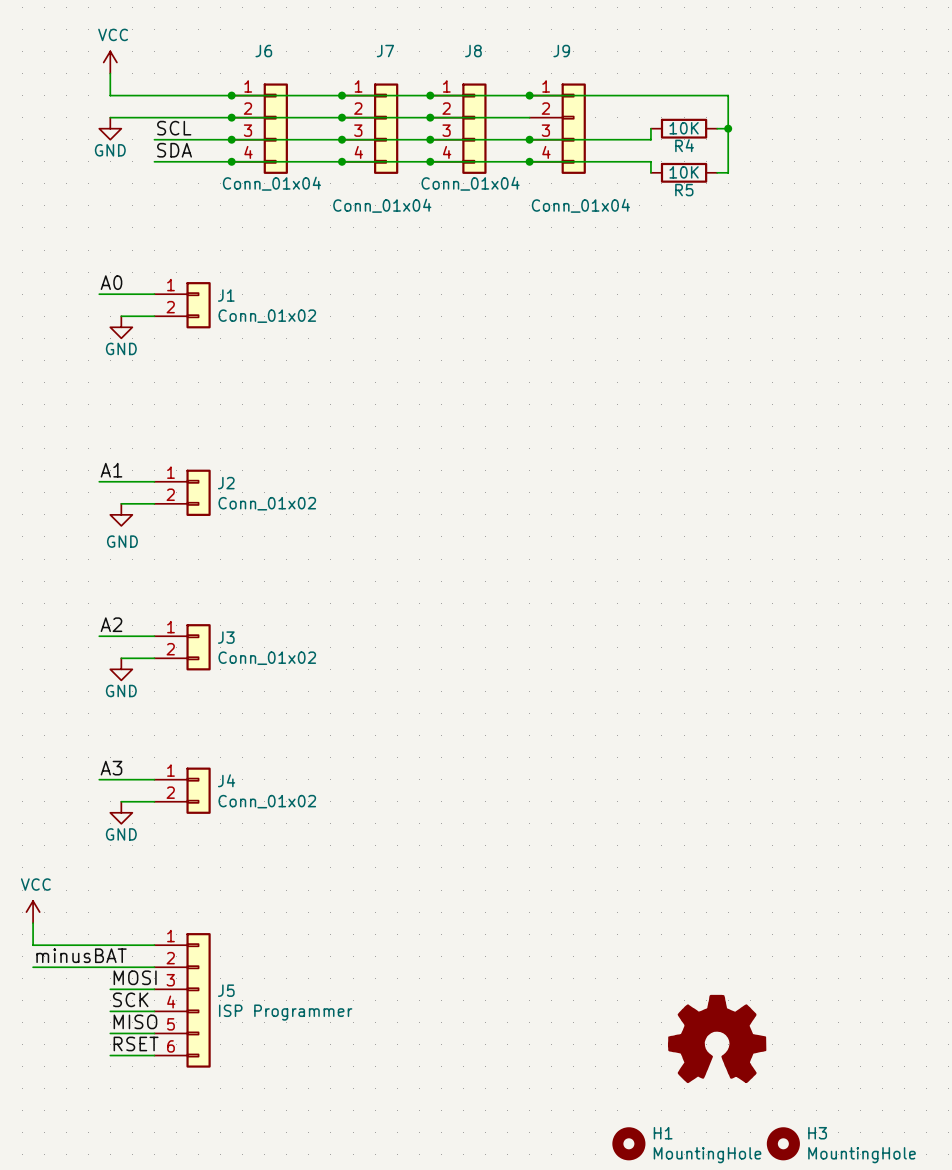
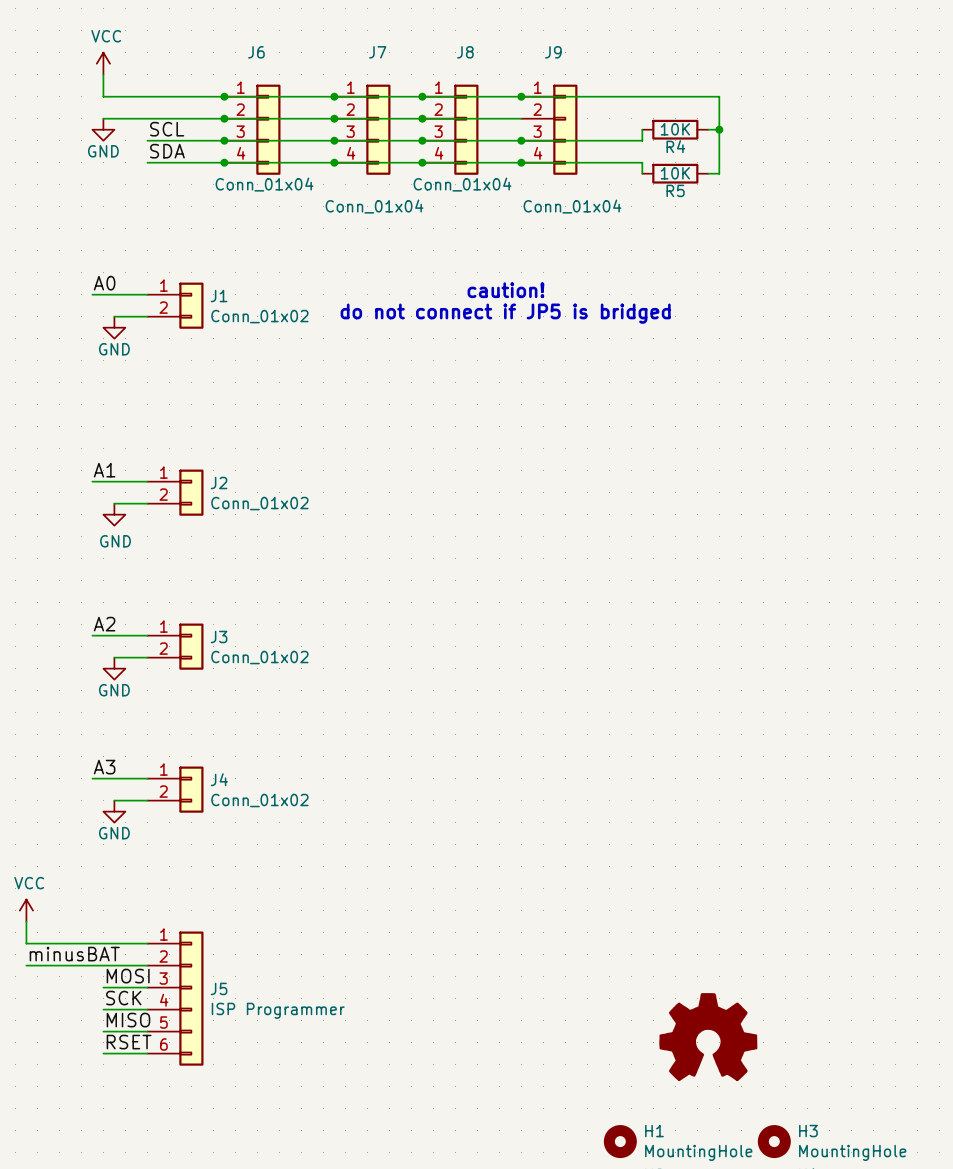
text: none -> caution! (505, 290)
text: none -> do not connect if JP5 is bridged (505, 313)

